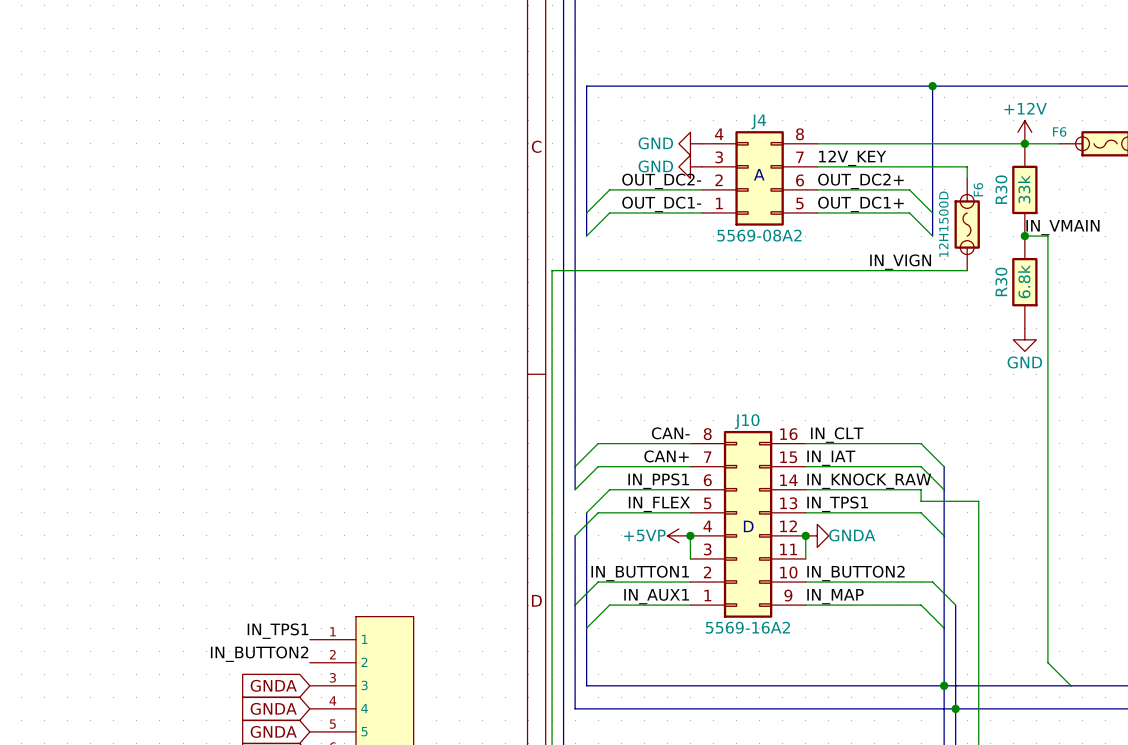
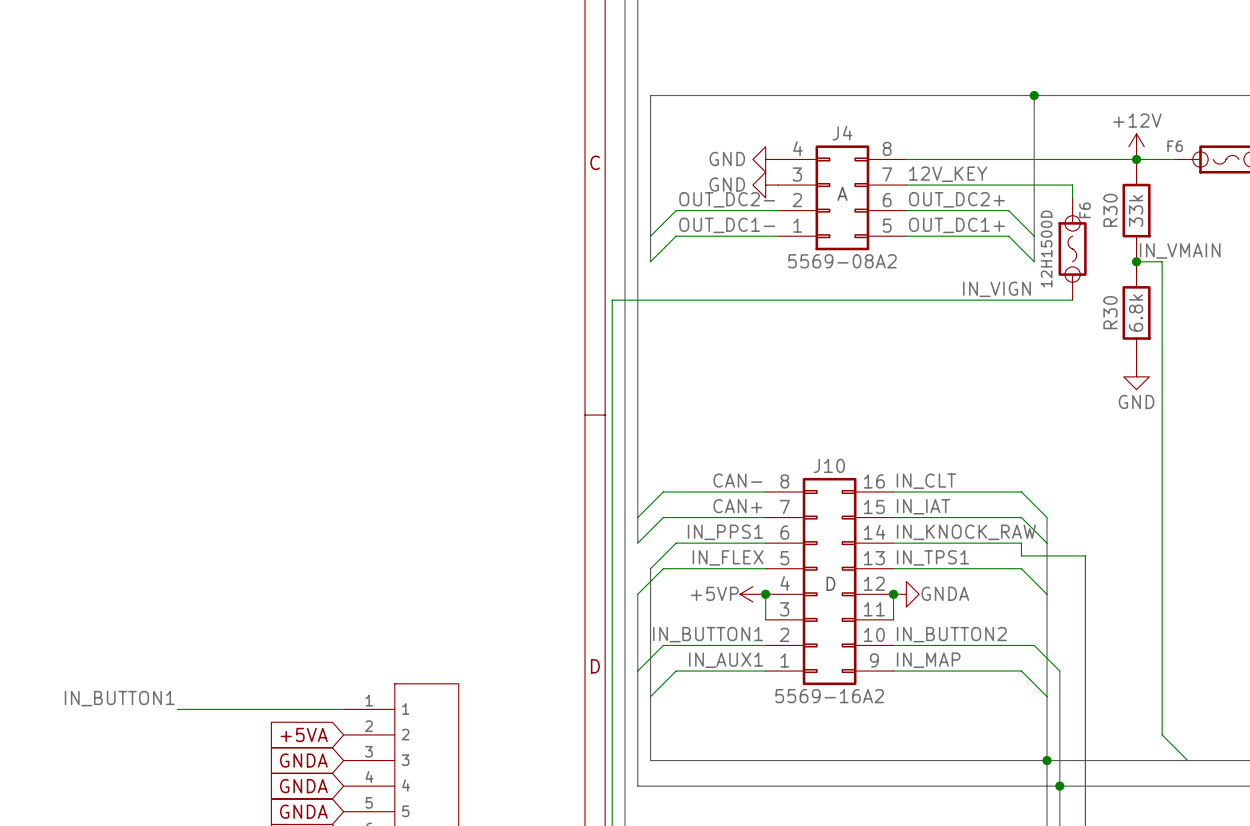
label: none -> IN_BUTTON1 (119, 698)
label: IN_TPS1 (278, 631) -> none
wire: none -> (177, 709) (343, 709)
label: IN_BUTTON2 (259, 654) -> none
global label: none -> +5VA (304, 734)

